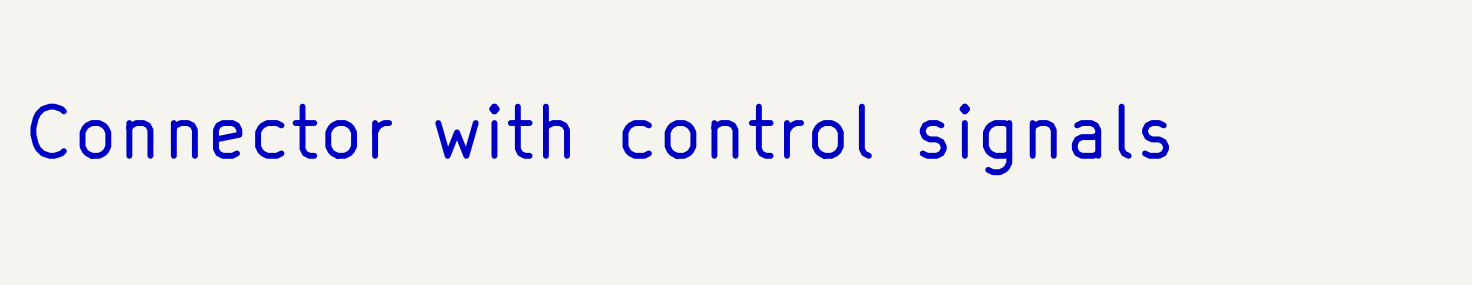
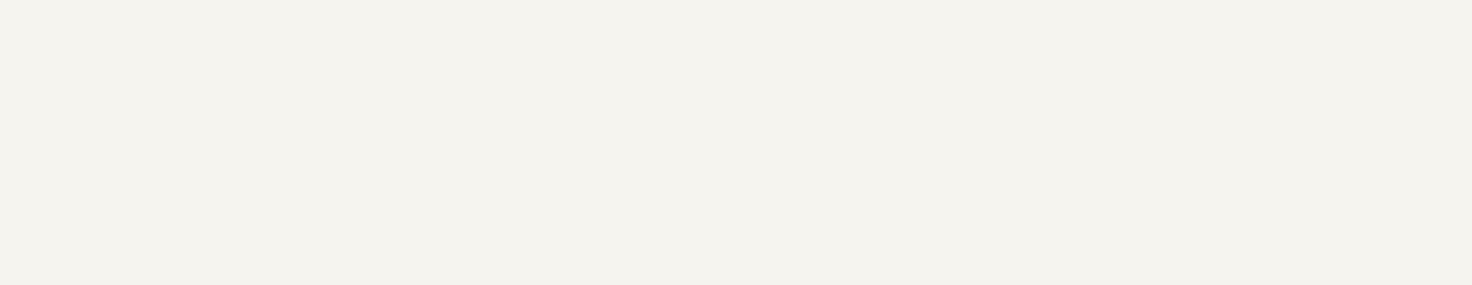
text: Connector with control signals (599, 139) -> none

